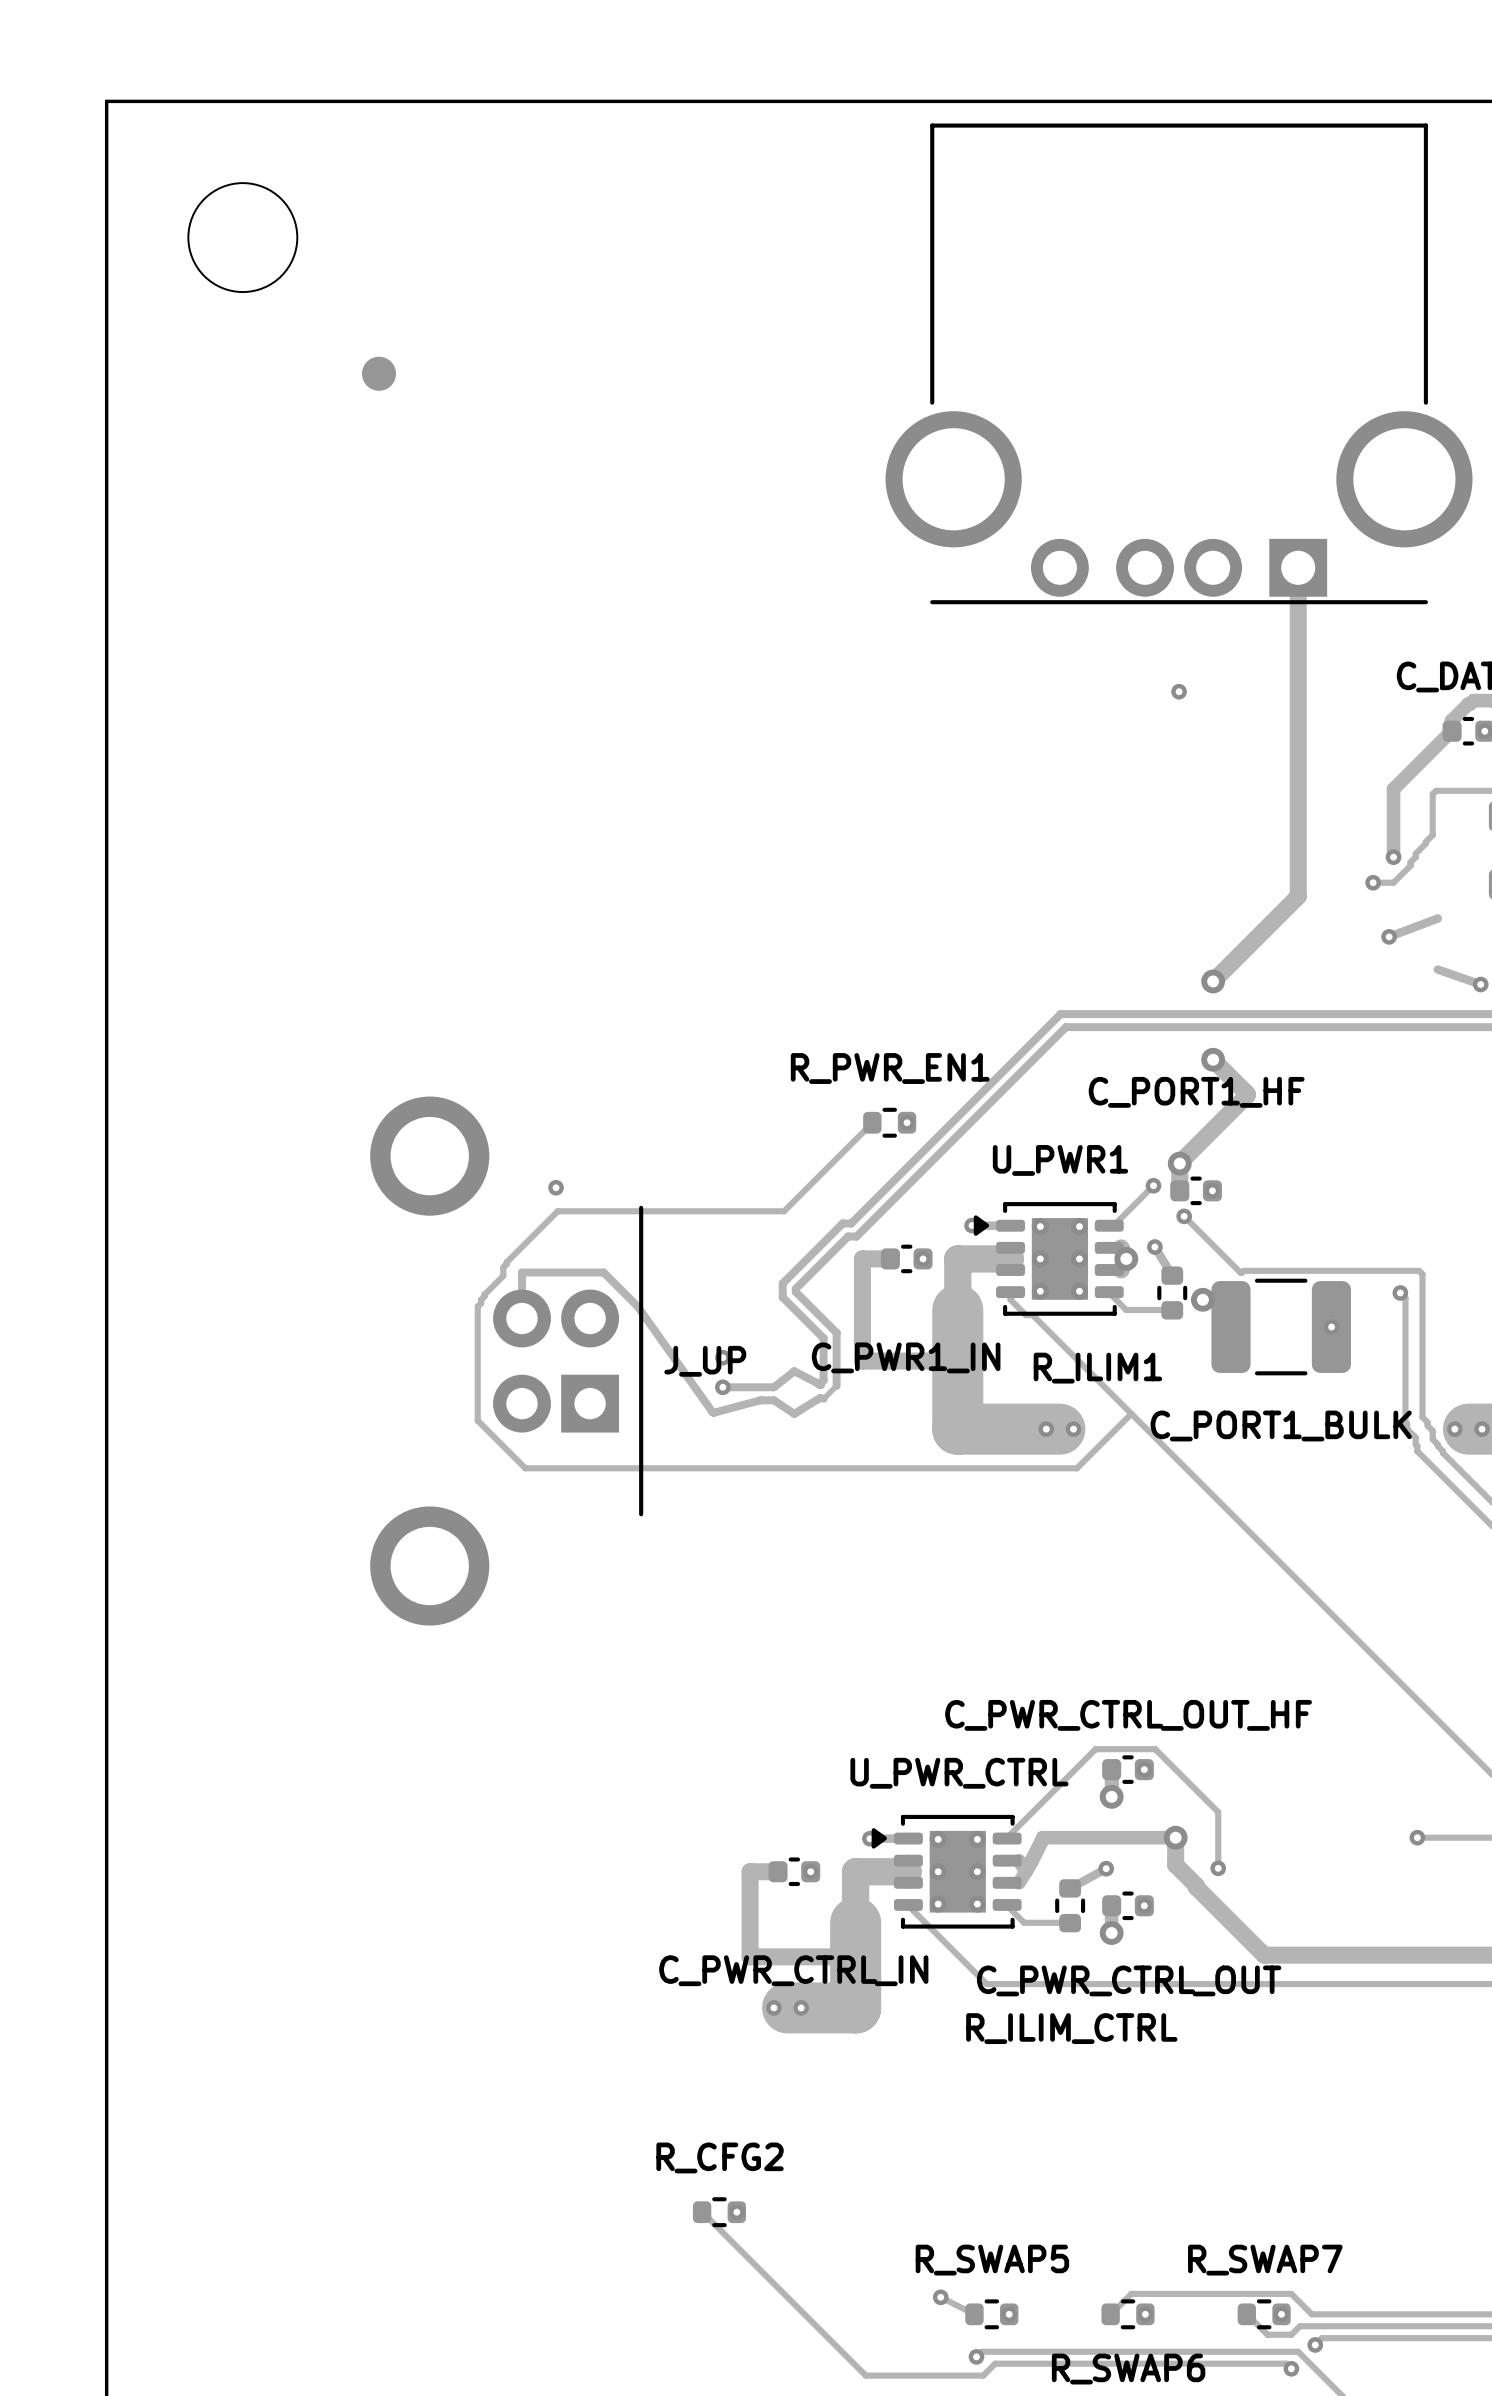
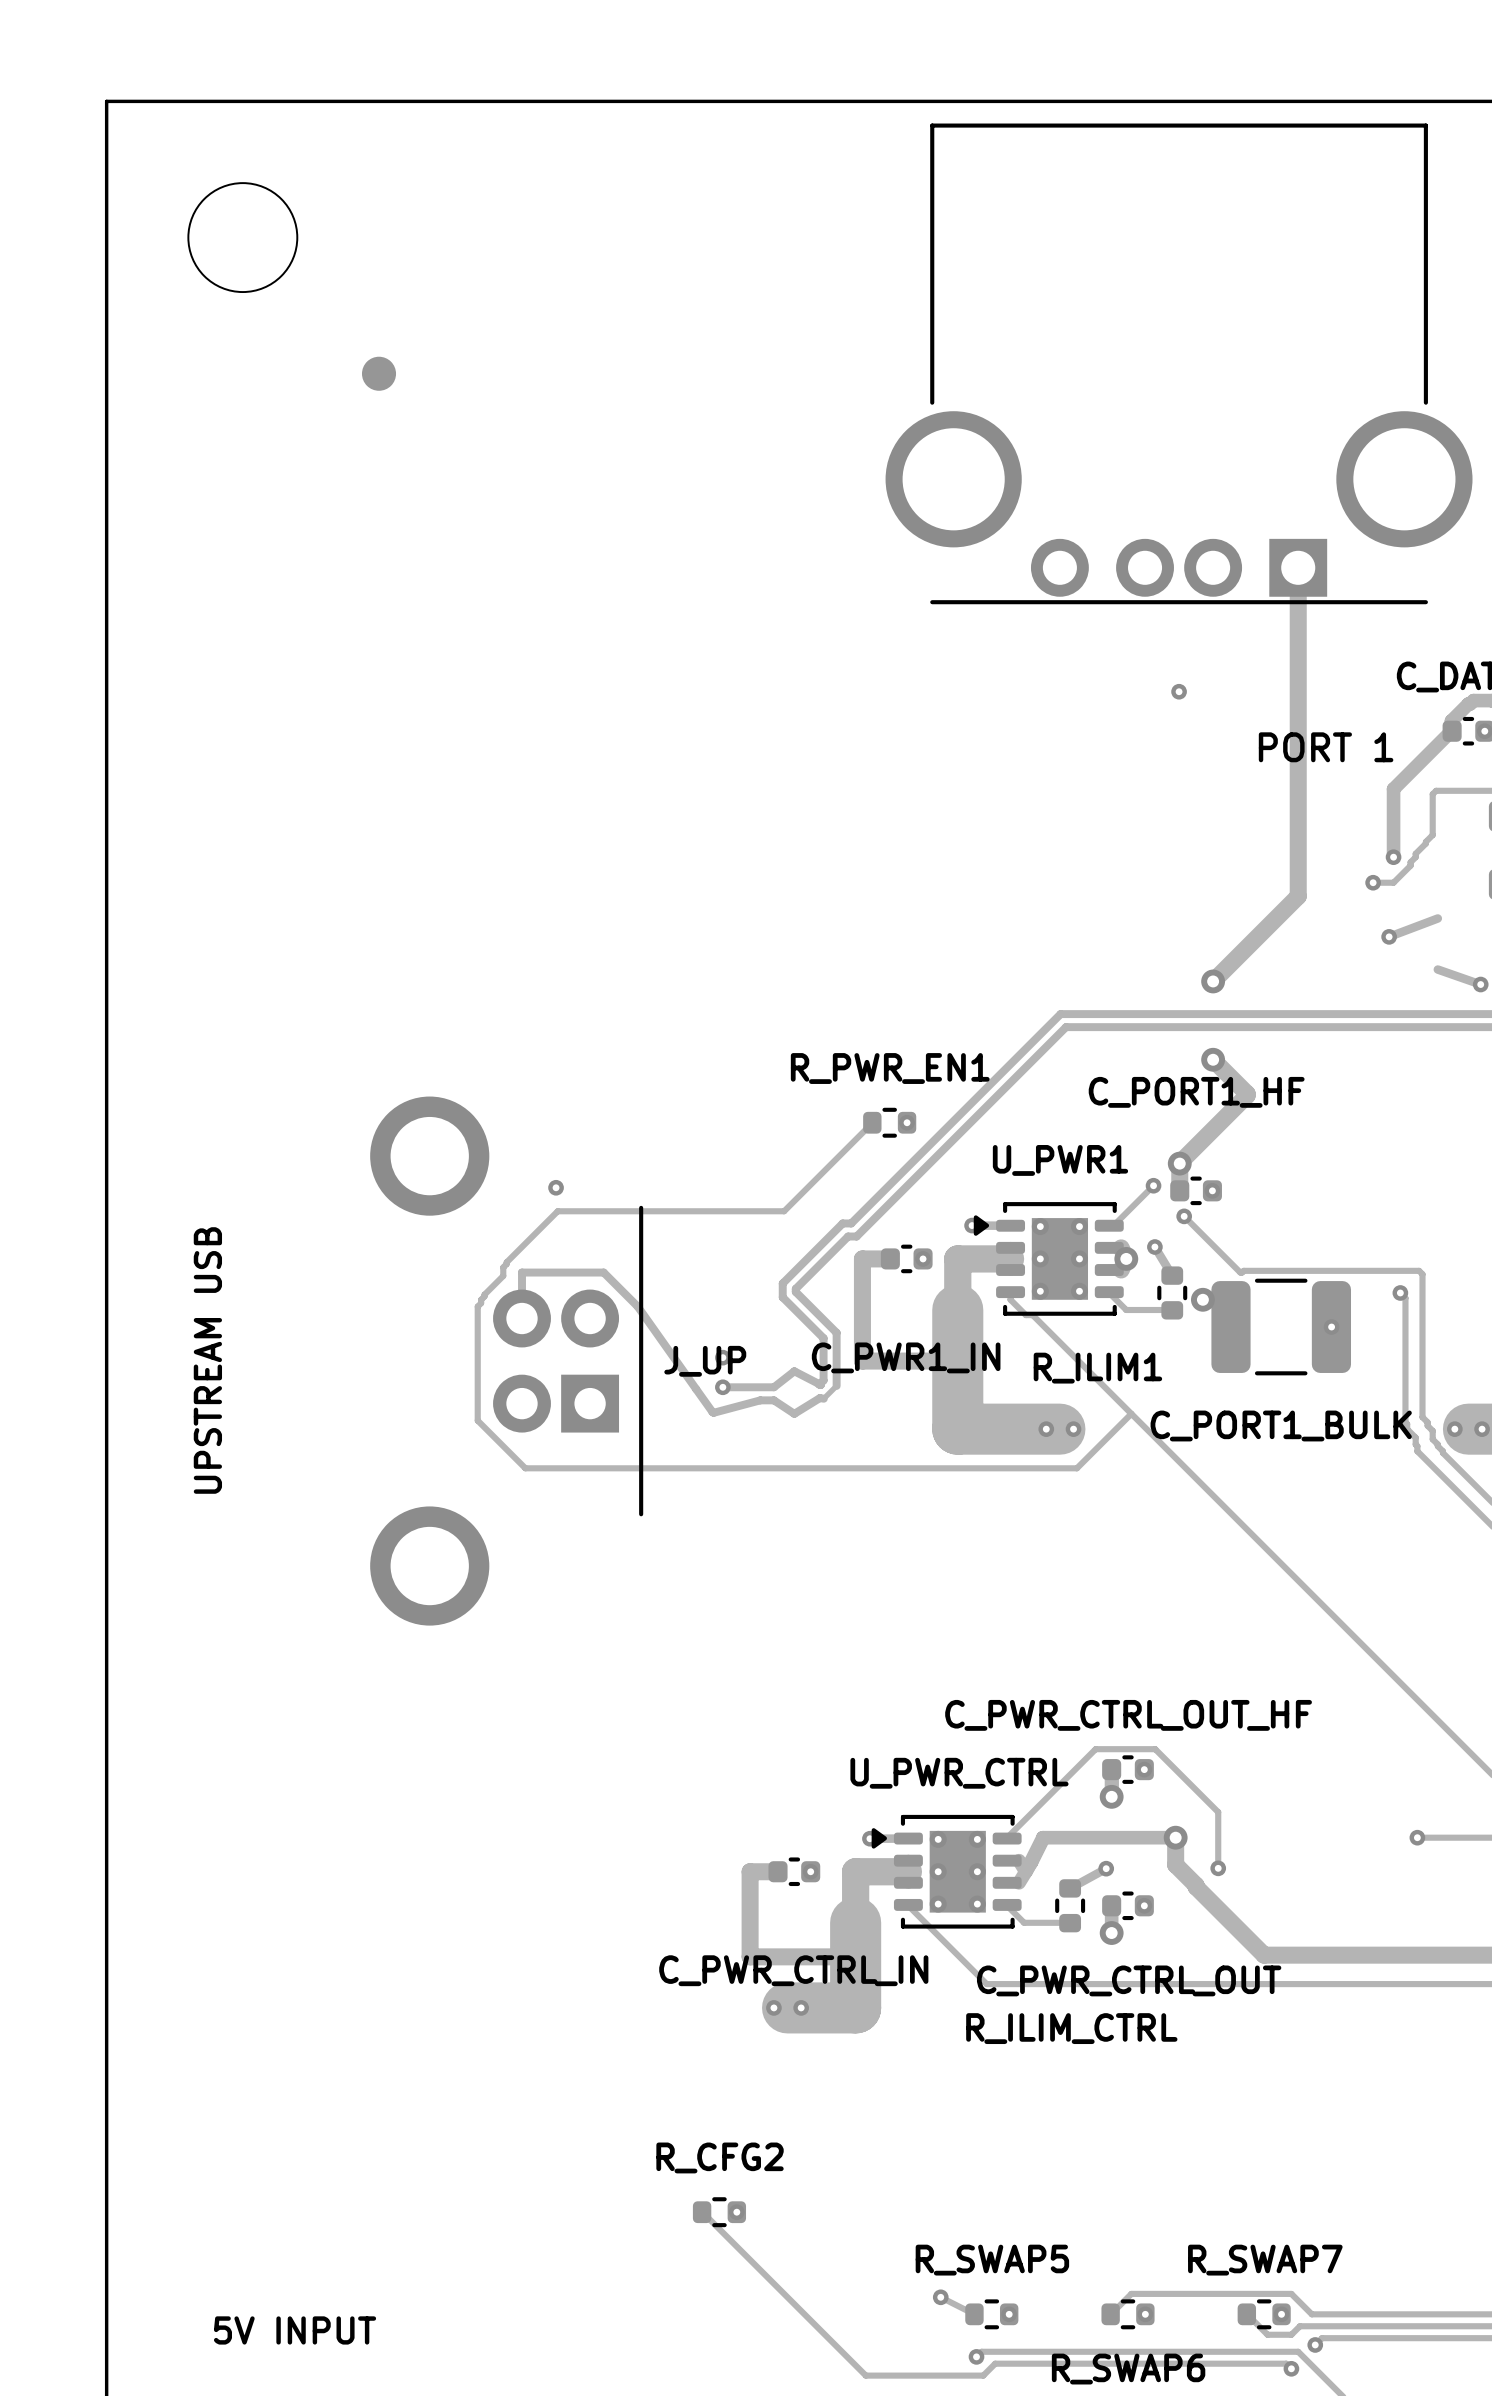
text: none -> PORT 1 (1326, 747)
text: none -> UPSTREAM USB (207, 1360)
text: none -> 5V INPUT (295, 2330)

